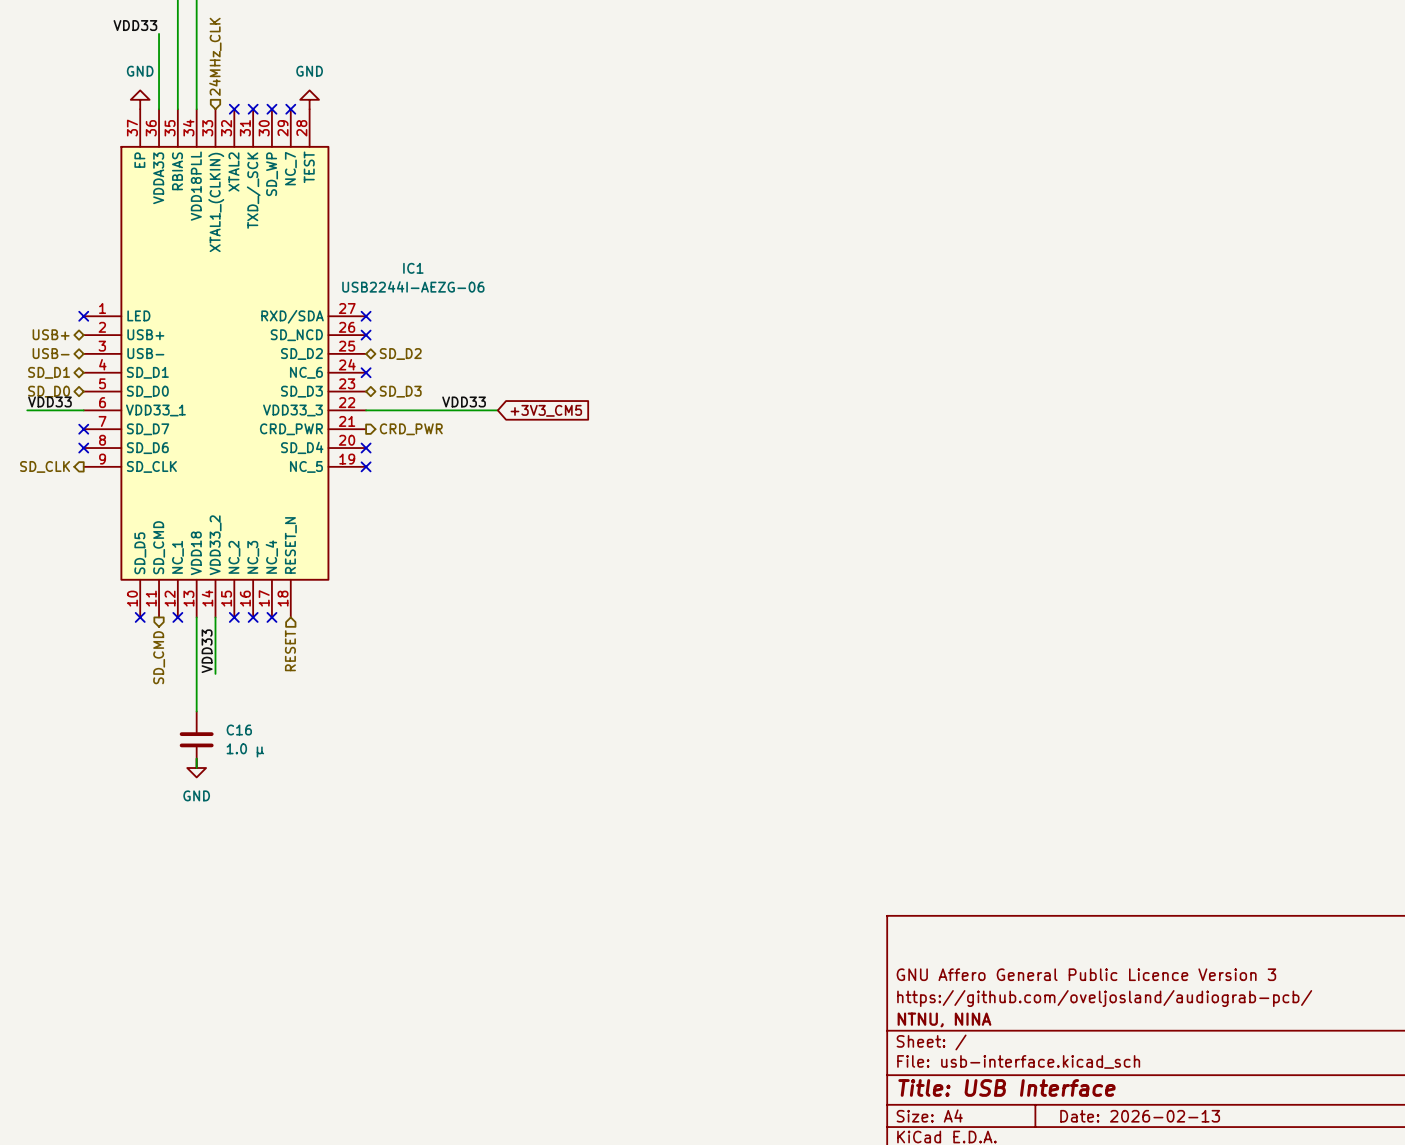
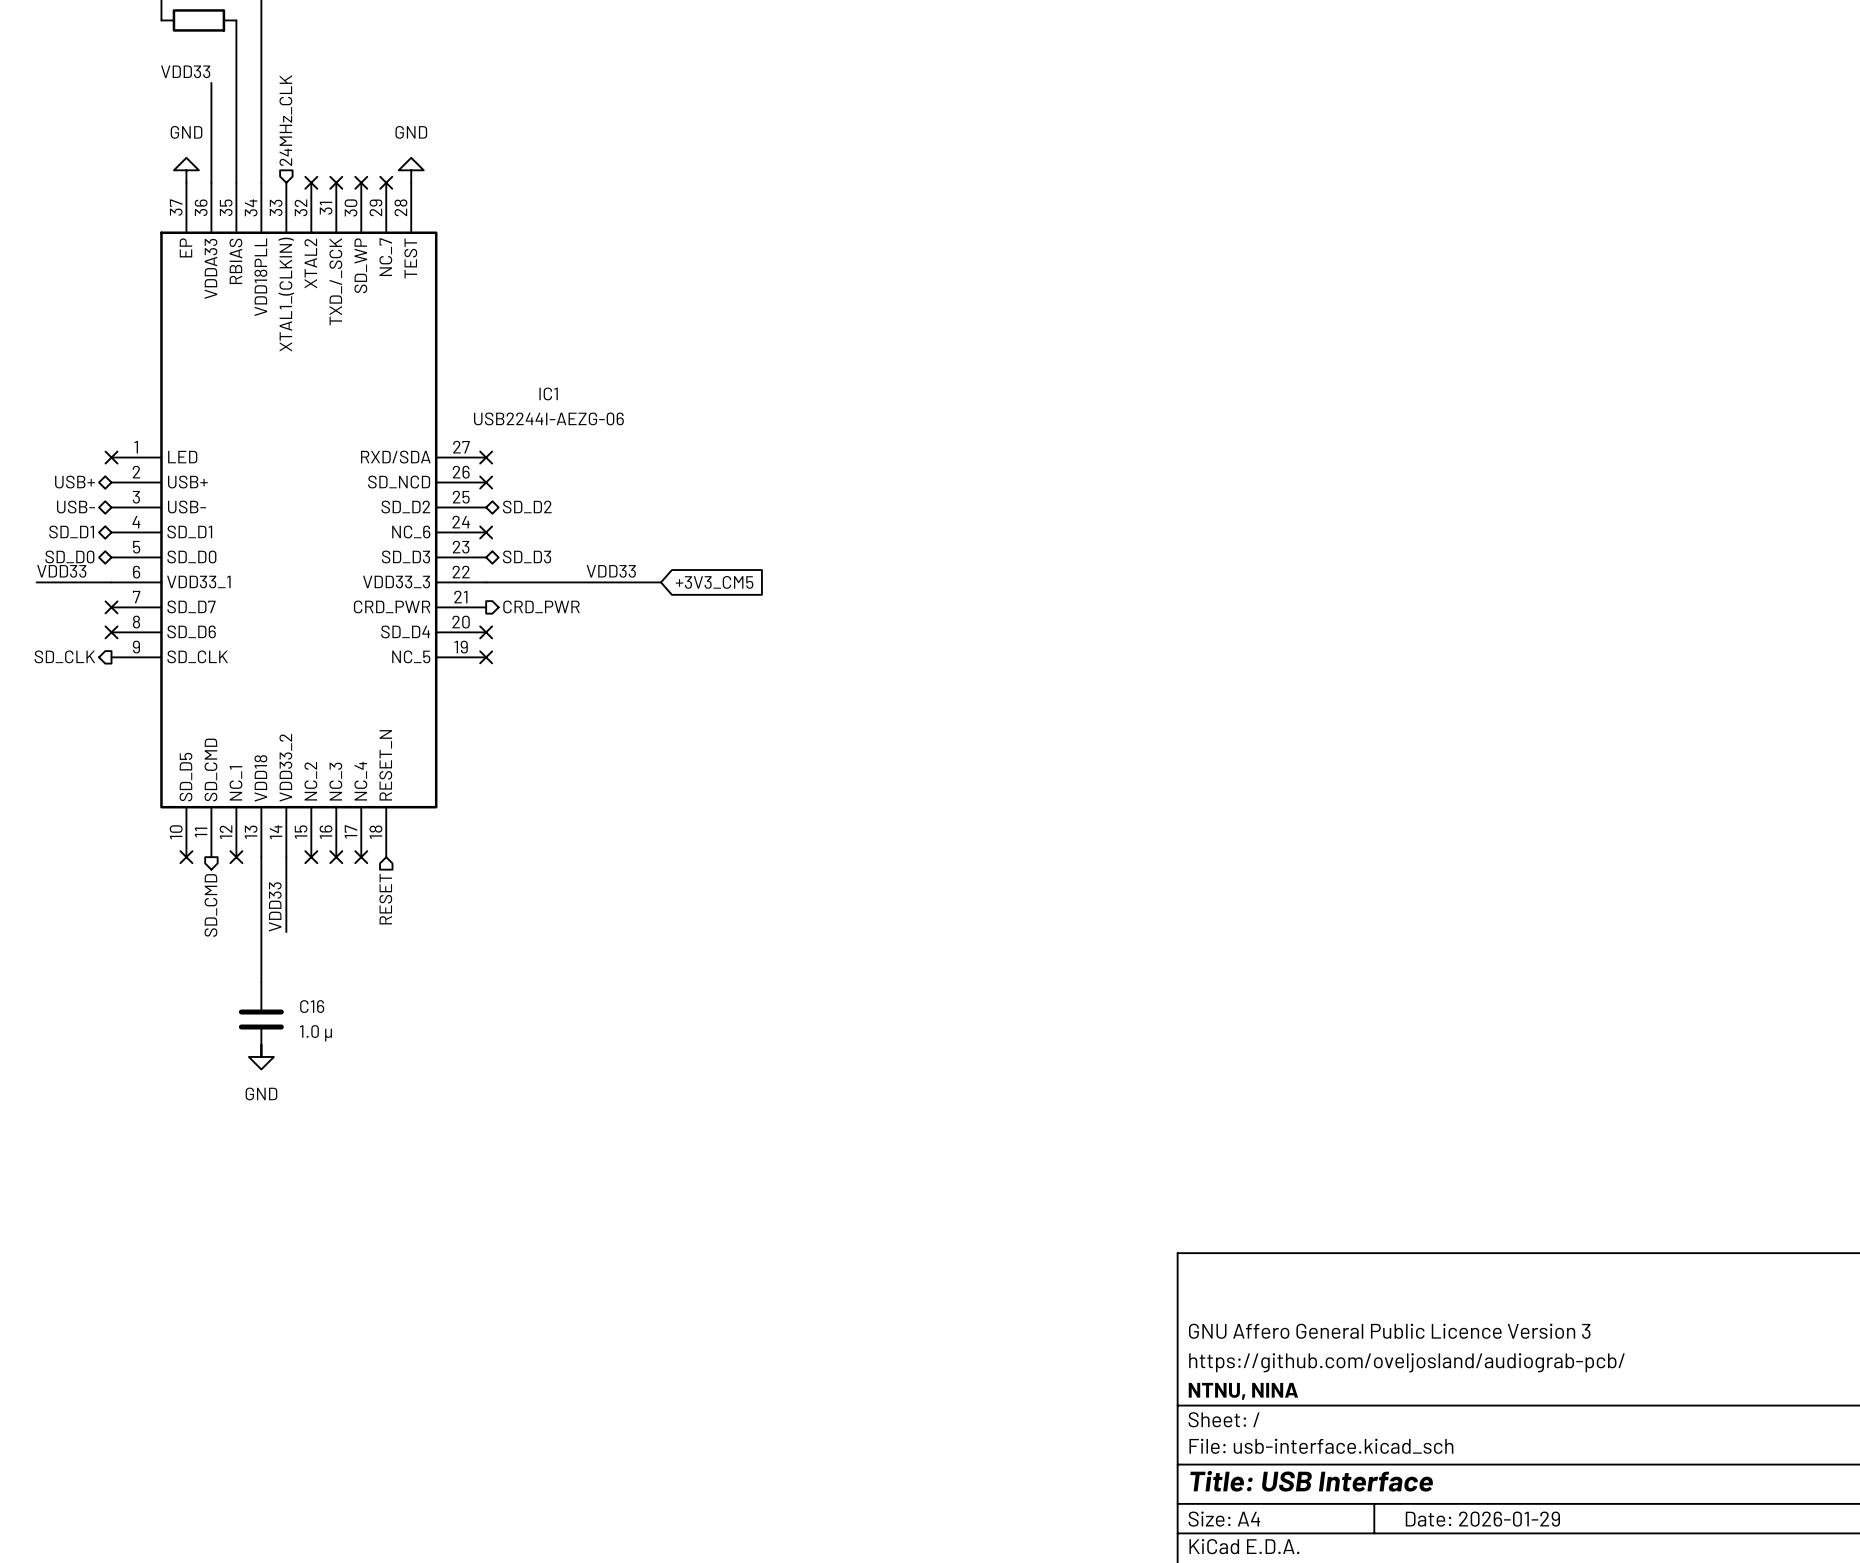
title block: Date: 2026-02-13 (1140, 1116) -> Date: 2026-01-29 (1482, 1519)

